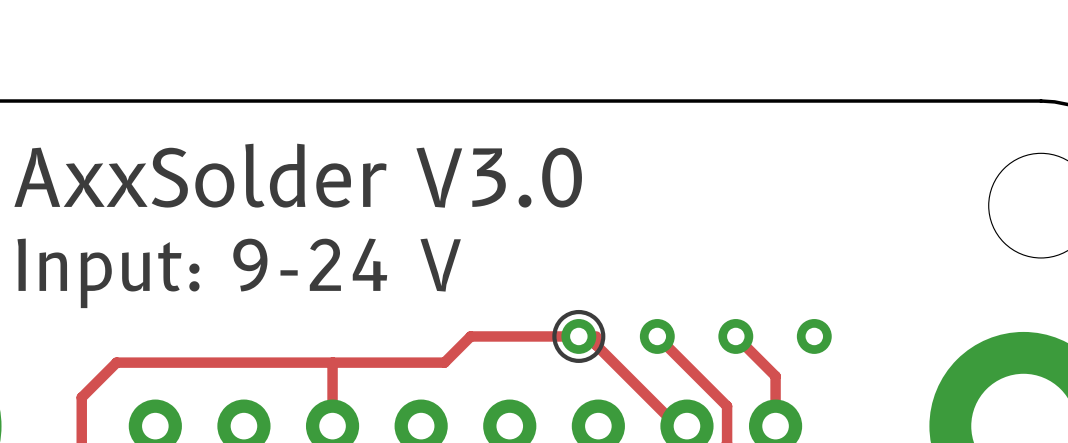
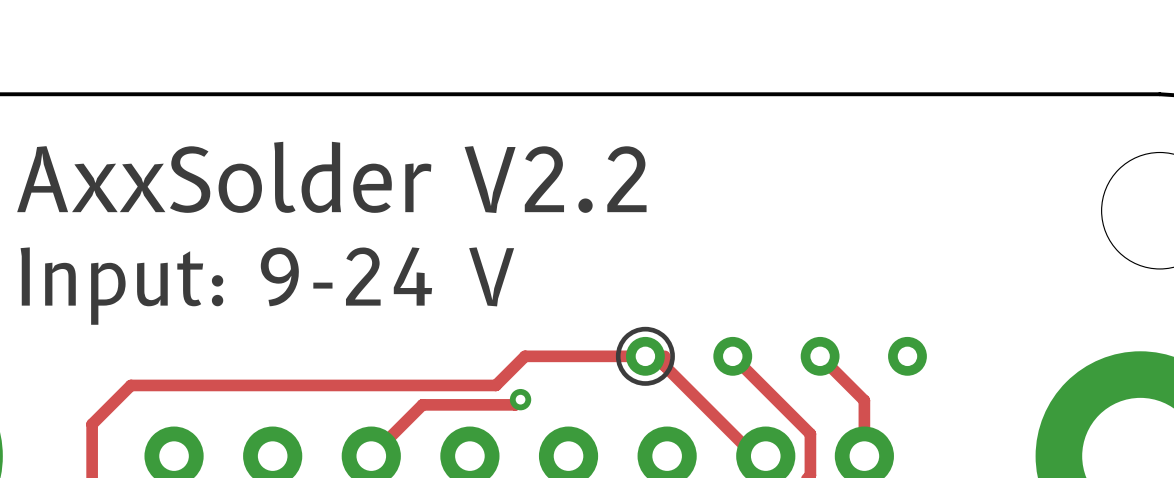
text: AxxSolder V3.0 (298, 175) -> AxxSolder V2.2 (331, 177)
track: (332, 362) (332, 426) -> (520, 399) (515, 404) (422, 404) (371, 456)
via: none -> (520, 399)

